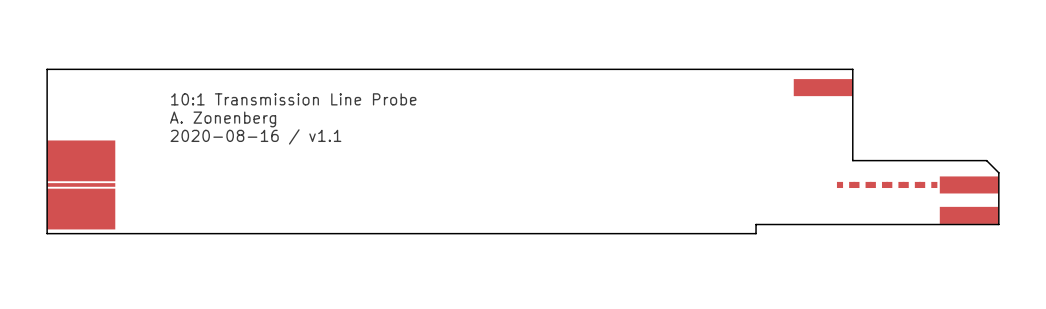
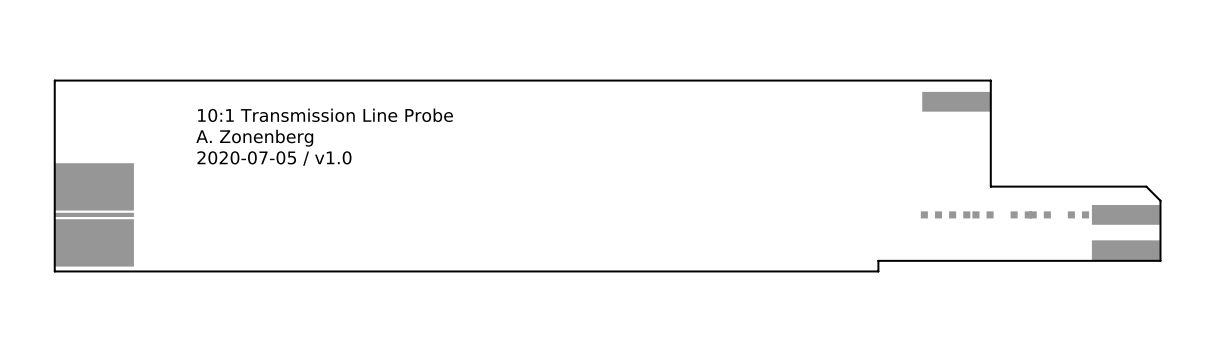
text: 2020-08-16 / v1.1 (255, 136) -> 2020-07-05 / v1.0 (274, 158)
part: none -> (931, 214)
part: none -> (959, 214)
part: (862, 184) -> none
part: (911, 184) -> none

